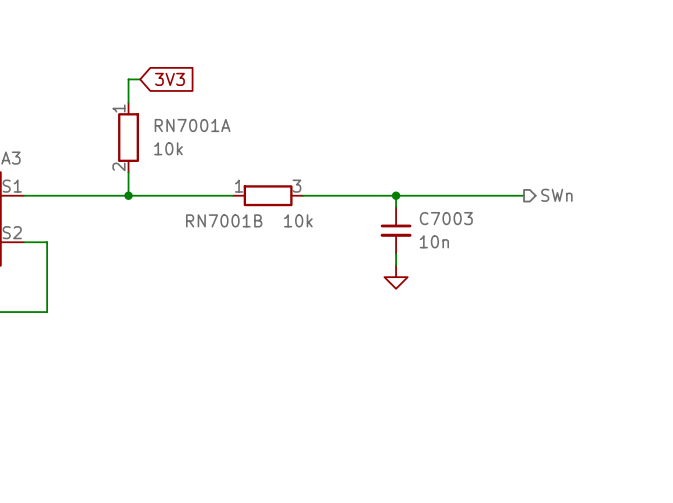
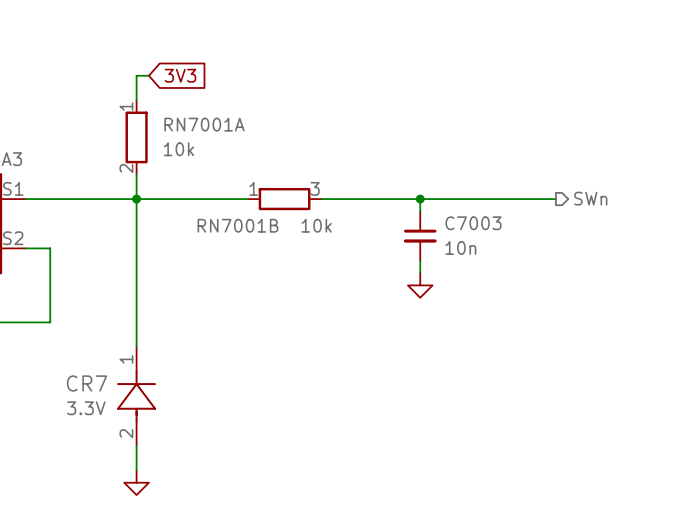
wire: none -> (136, 199) (136, 347)
CR7: none -> (136, 396)
wire: none -> (136, 445) (136, 470)
power symbol: none -> (136, 482)

